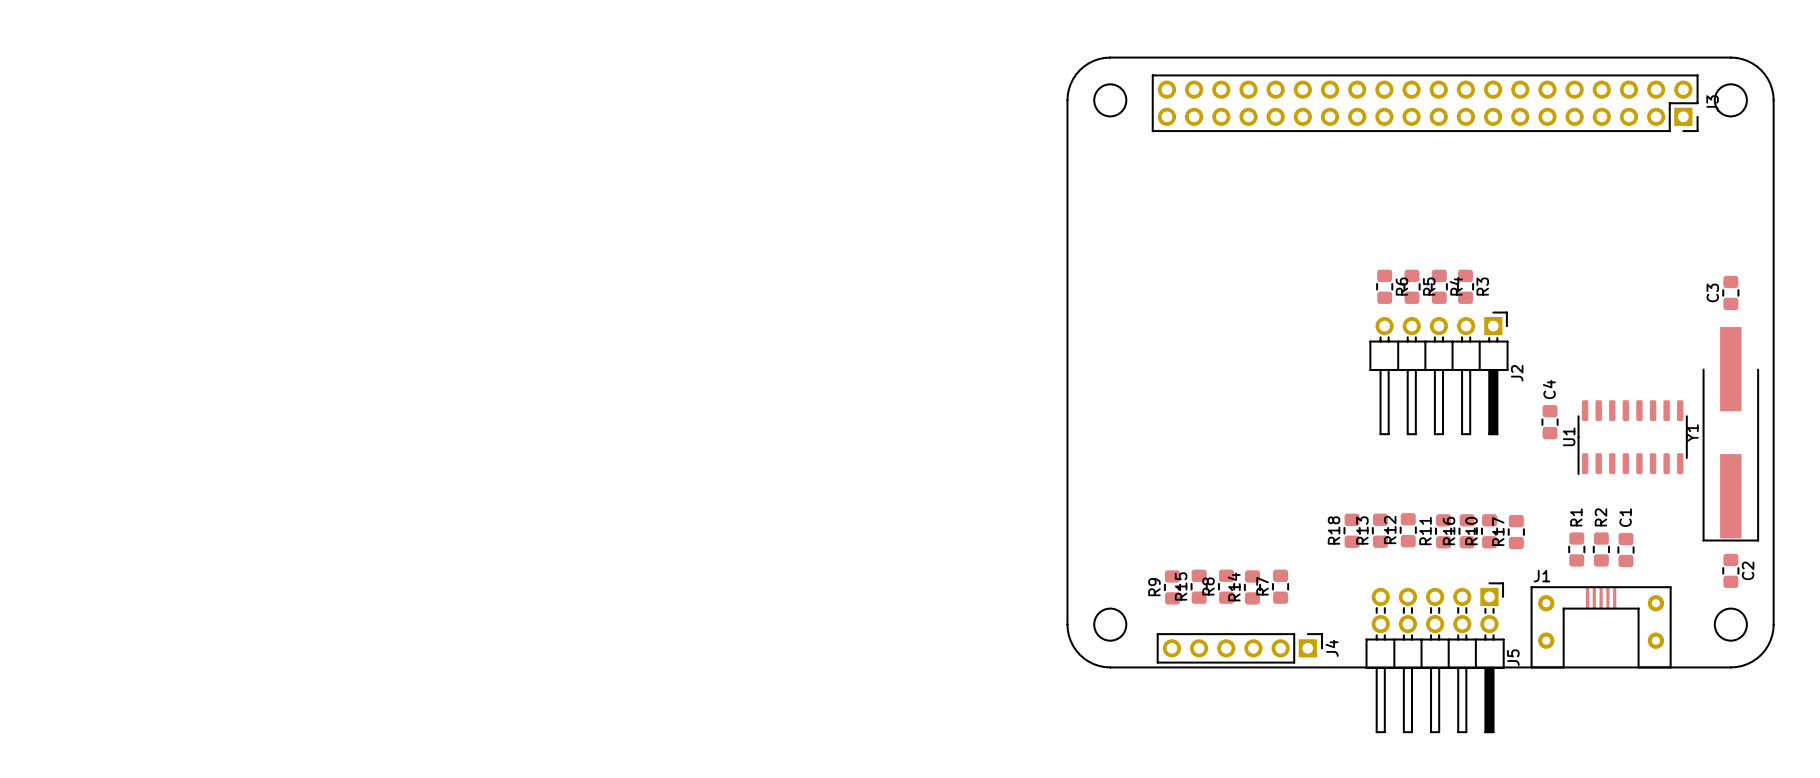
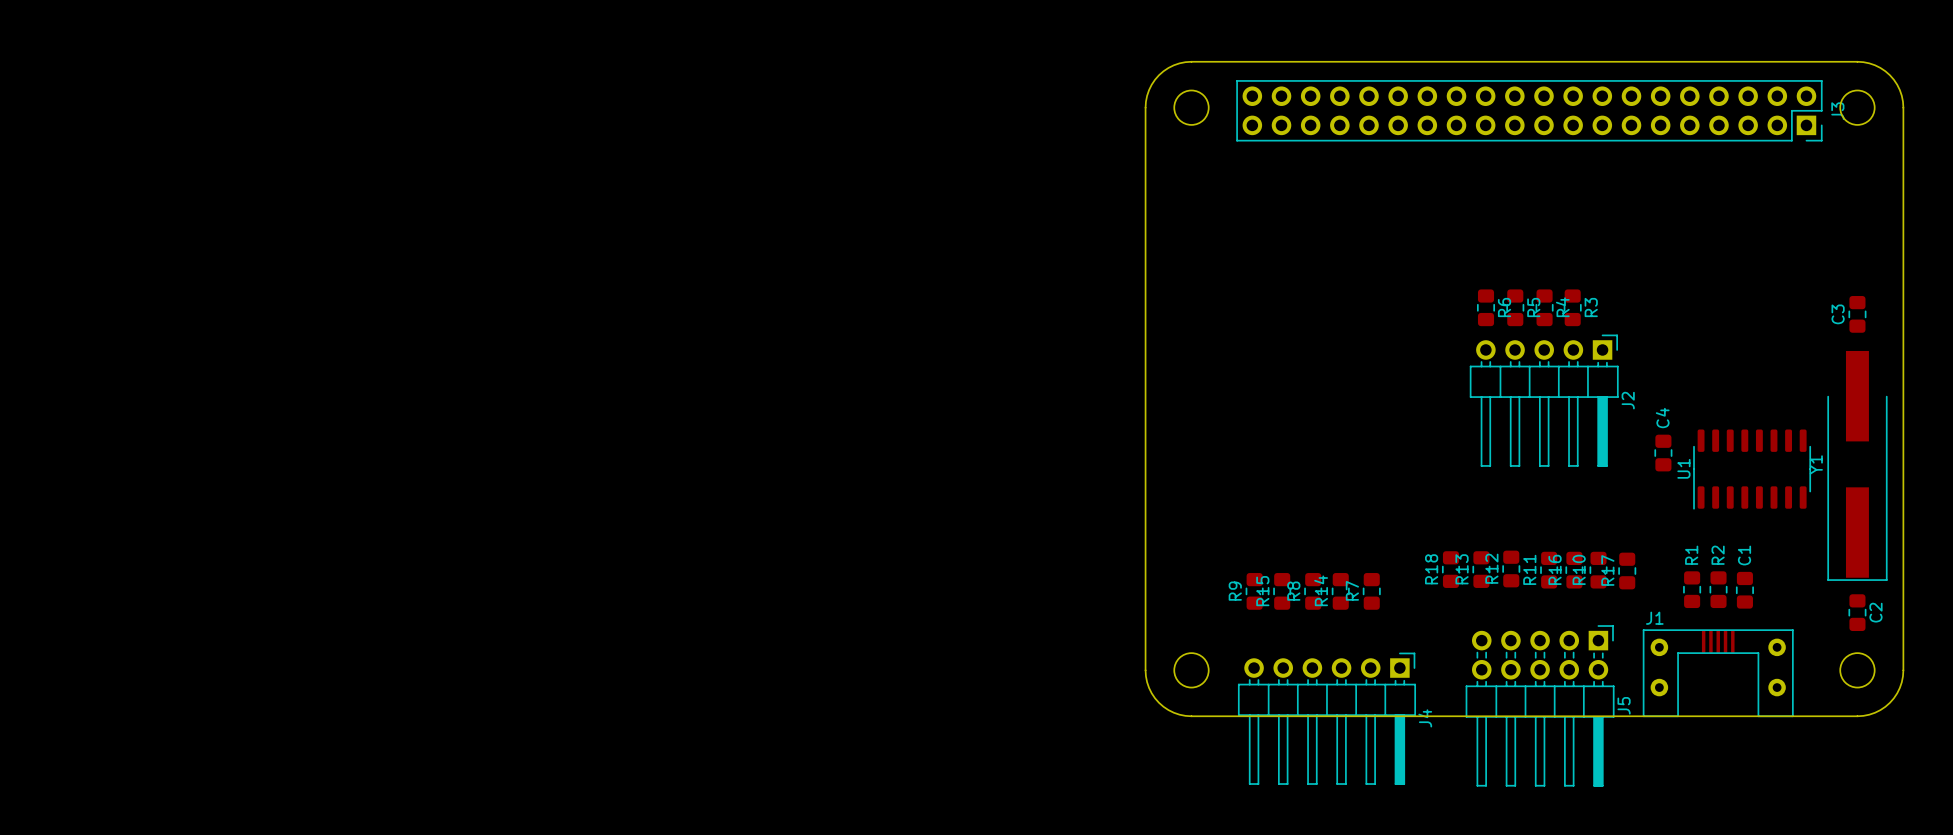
R15 position: (1199, 586) -> (1282, 591)
R8 position: (1226, 586) -> (1313, 591)
R7 position: (1280, 586) -> (1371, 591)
R9 position: (1172, 587) -> (1254, 591)
R14 position: (1252, 587) -> (1340, 591)
J4 footprint: [1157, 633, 1323, 664] -> [1238, 652, 1416, 785]

